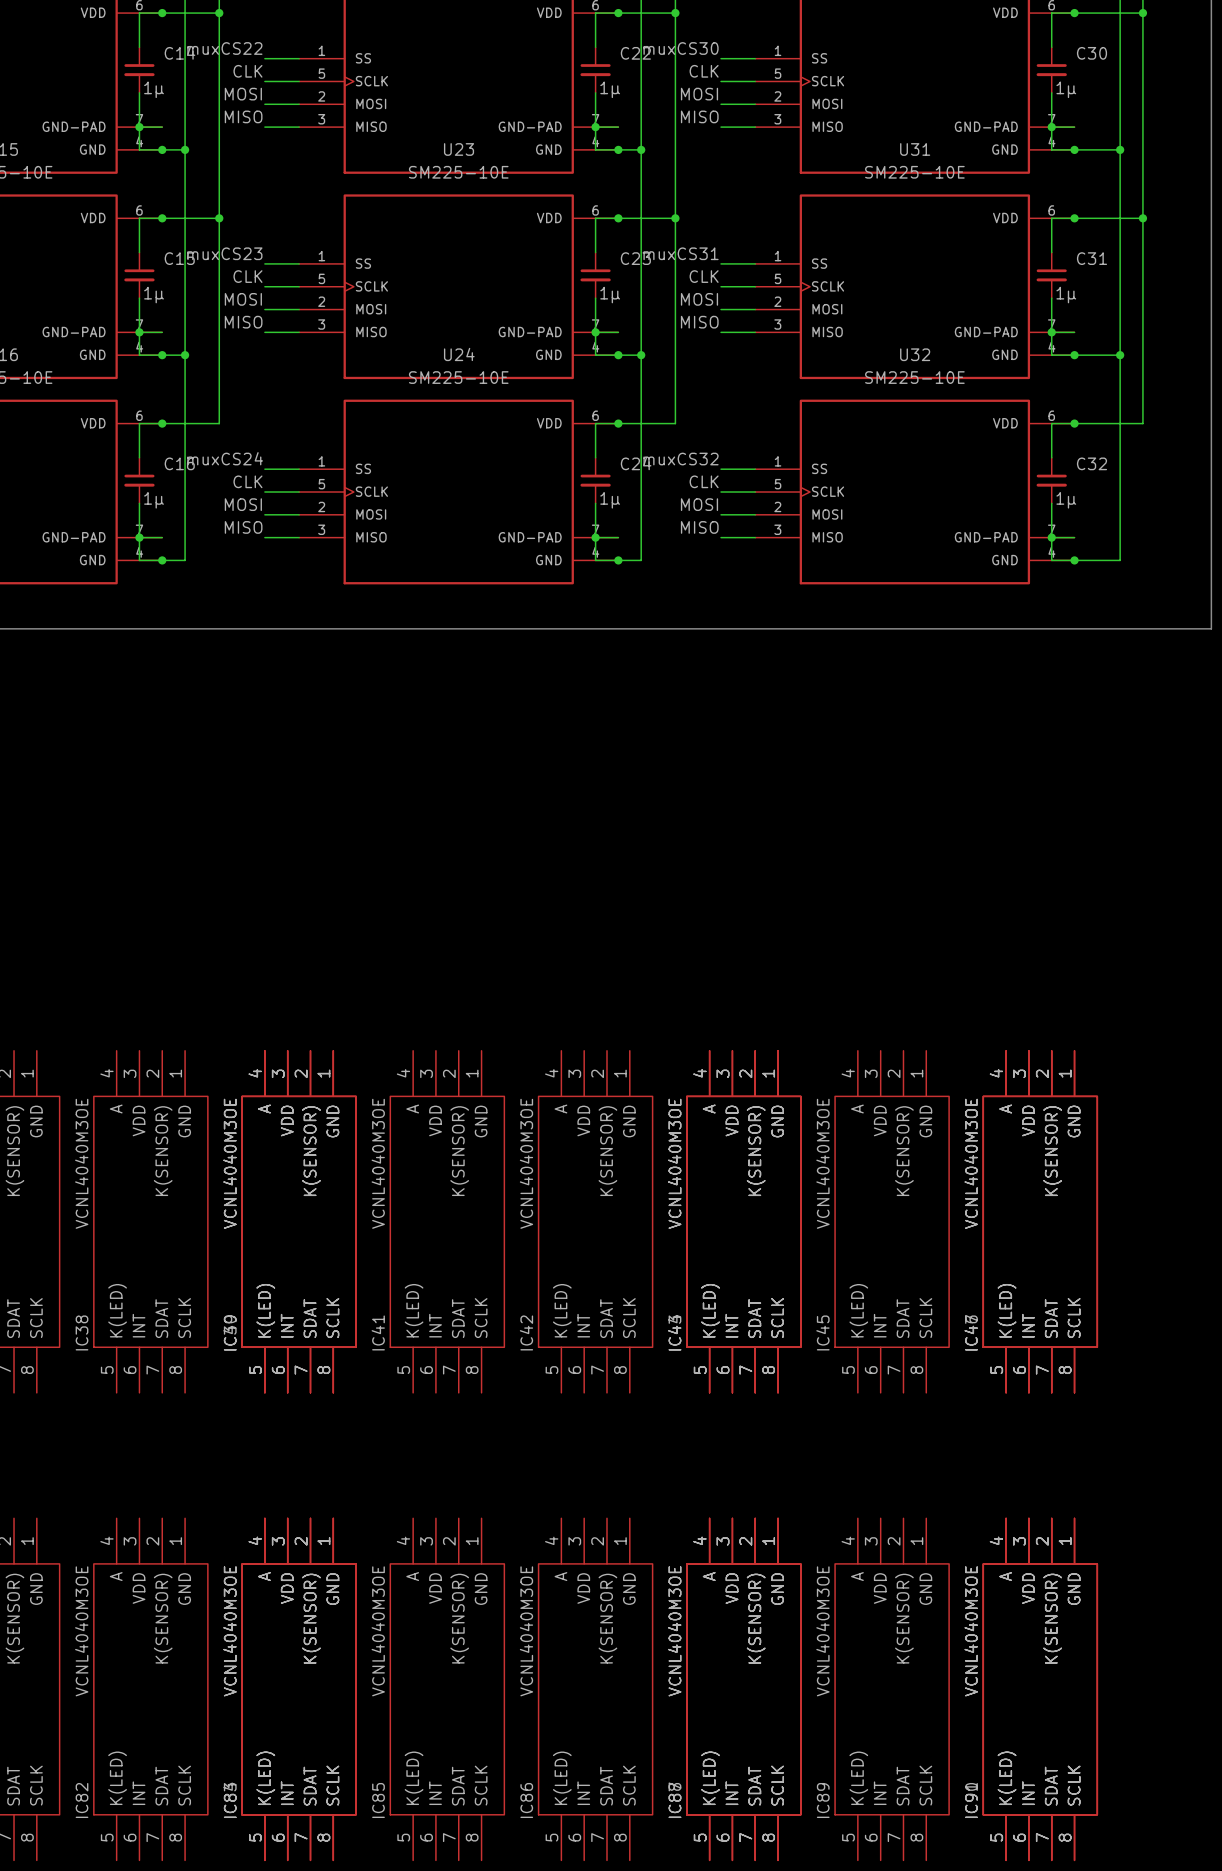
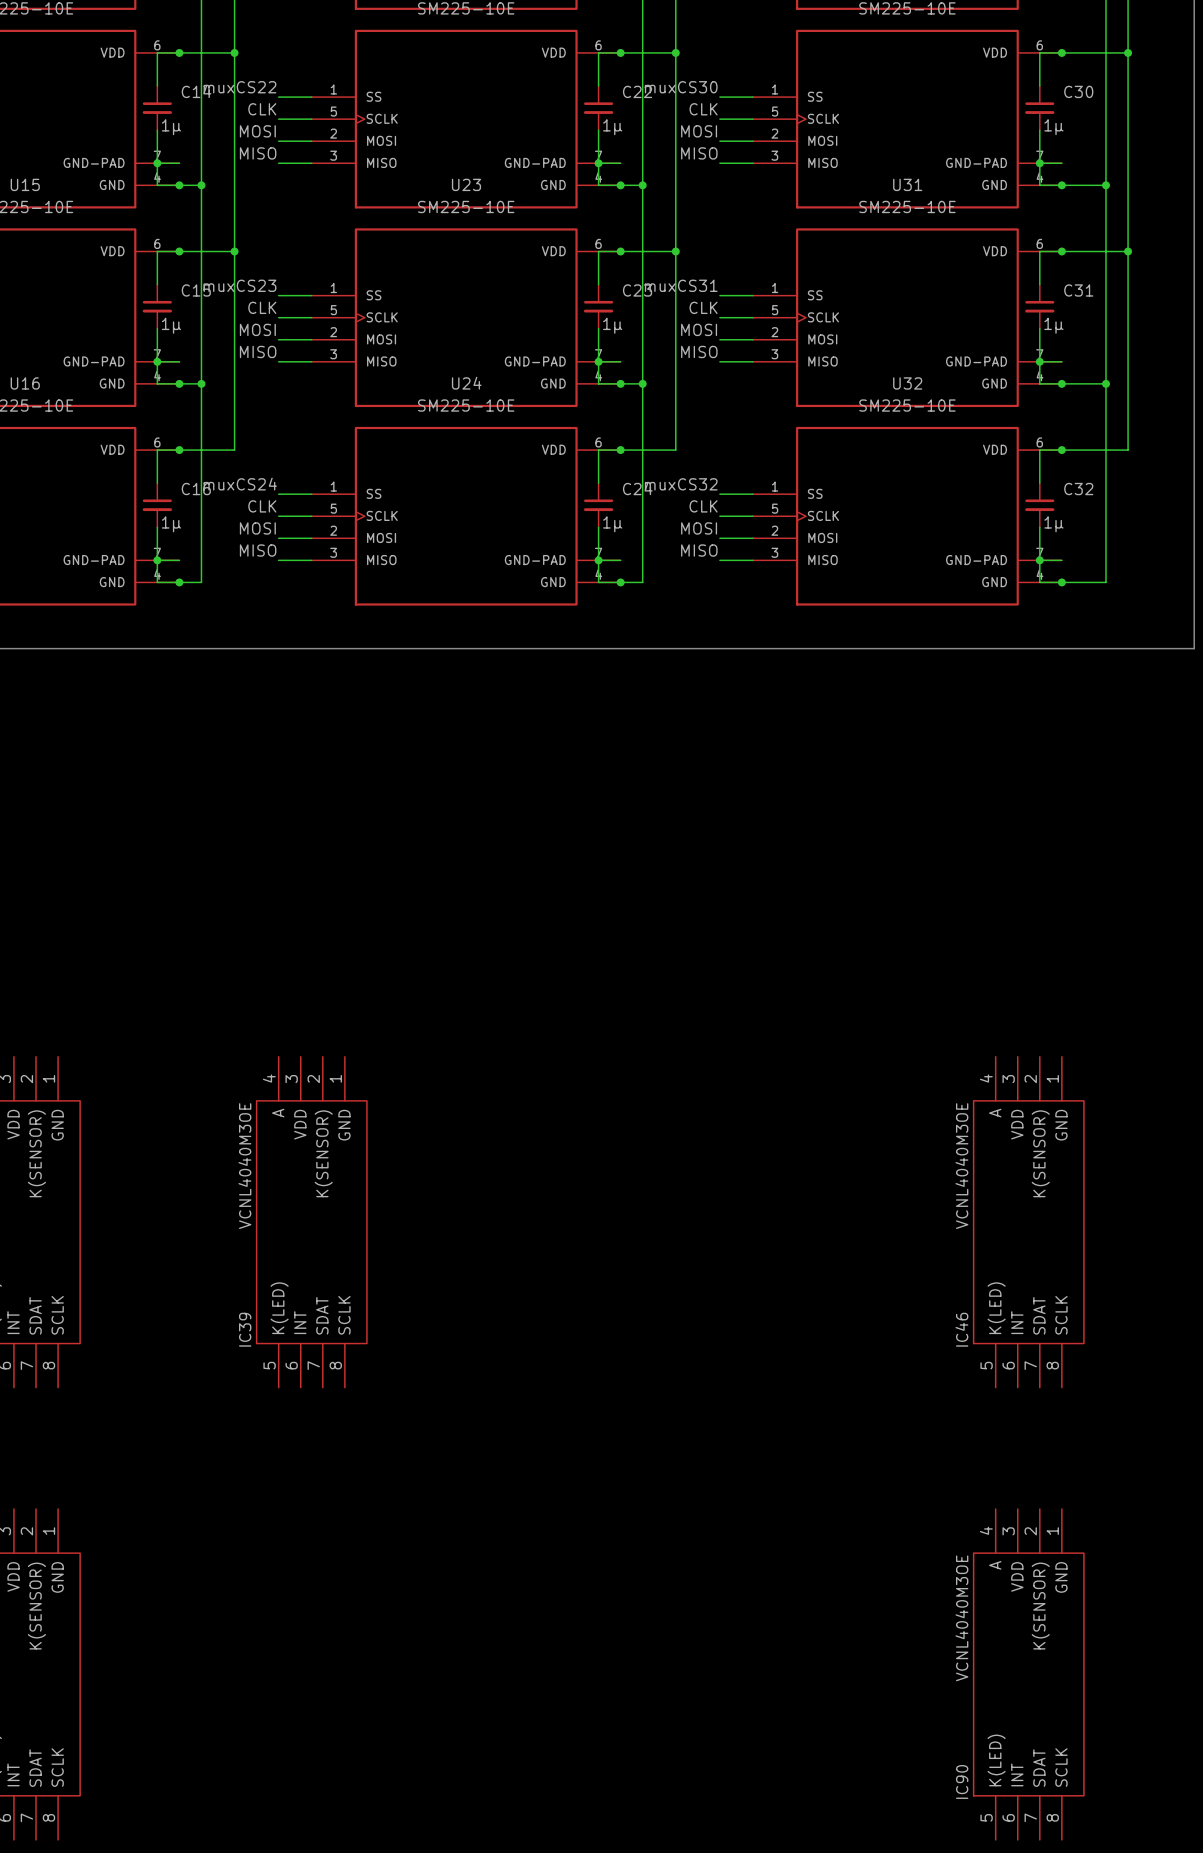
IC38: VCNL4040M3OE (150, 1221) -> none
part: VCNL4040M3OE (299, 1221) -> none
IC41: VCNL4040M3OE (447, 1221) -> none
IC42: VCNL4040M3OE (595, 1221) -> none
part: VCNL4040M3OE (743, 1221) -> none
part: VCNL4040M3OE (743, 1221) -> none
IC45: VCNL4040M3OE (892, 1221) -> none
part: VCNL4040M3OE (1040, 1221) -> none
IC82: VCNL4040M3OE (150, 1689) -> none
part: VCNL4040M3OE (299, 1689) -> none
part: VCNL4040M3OE (299, 1689) -> none
IC85: VCNL4040M3OE (447, 1689) -> none
IC86: VCNL4040M3OE (595, 1689) -> none
part: VCNL4040M3OE (743, 1689) -> none
part: VCNL4040M3OE (743, 1689) -> none
IC89: VCNL4040M3OE (892, 1689) -> none
part: VCNL4040M3OE (1040, 1689) -> none

